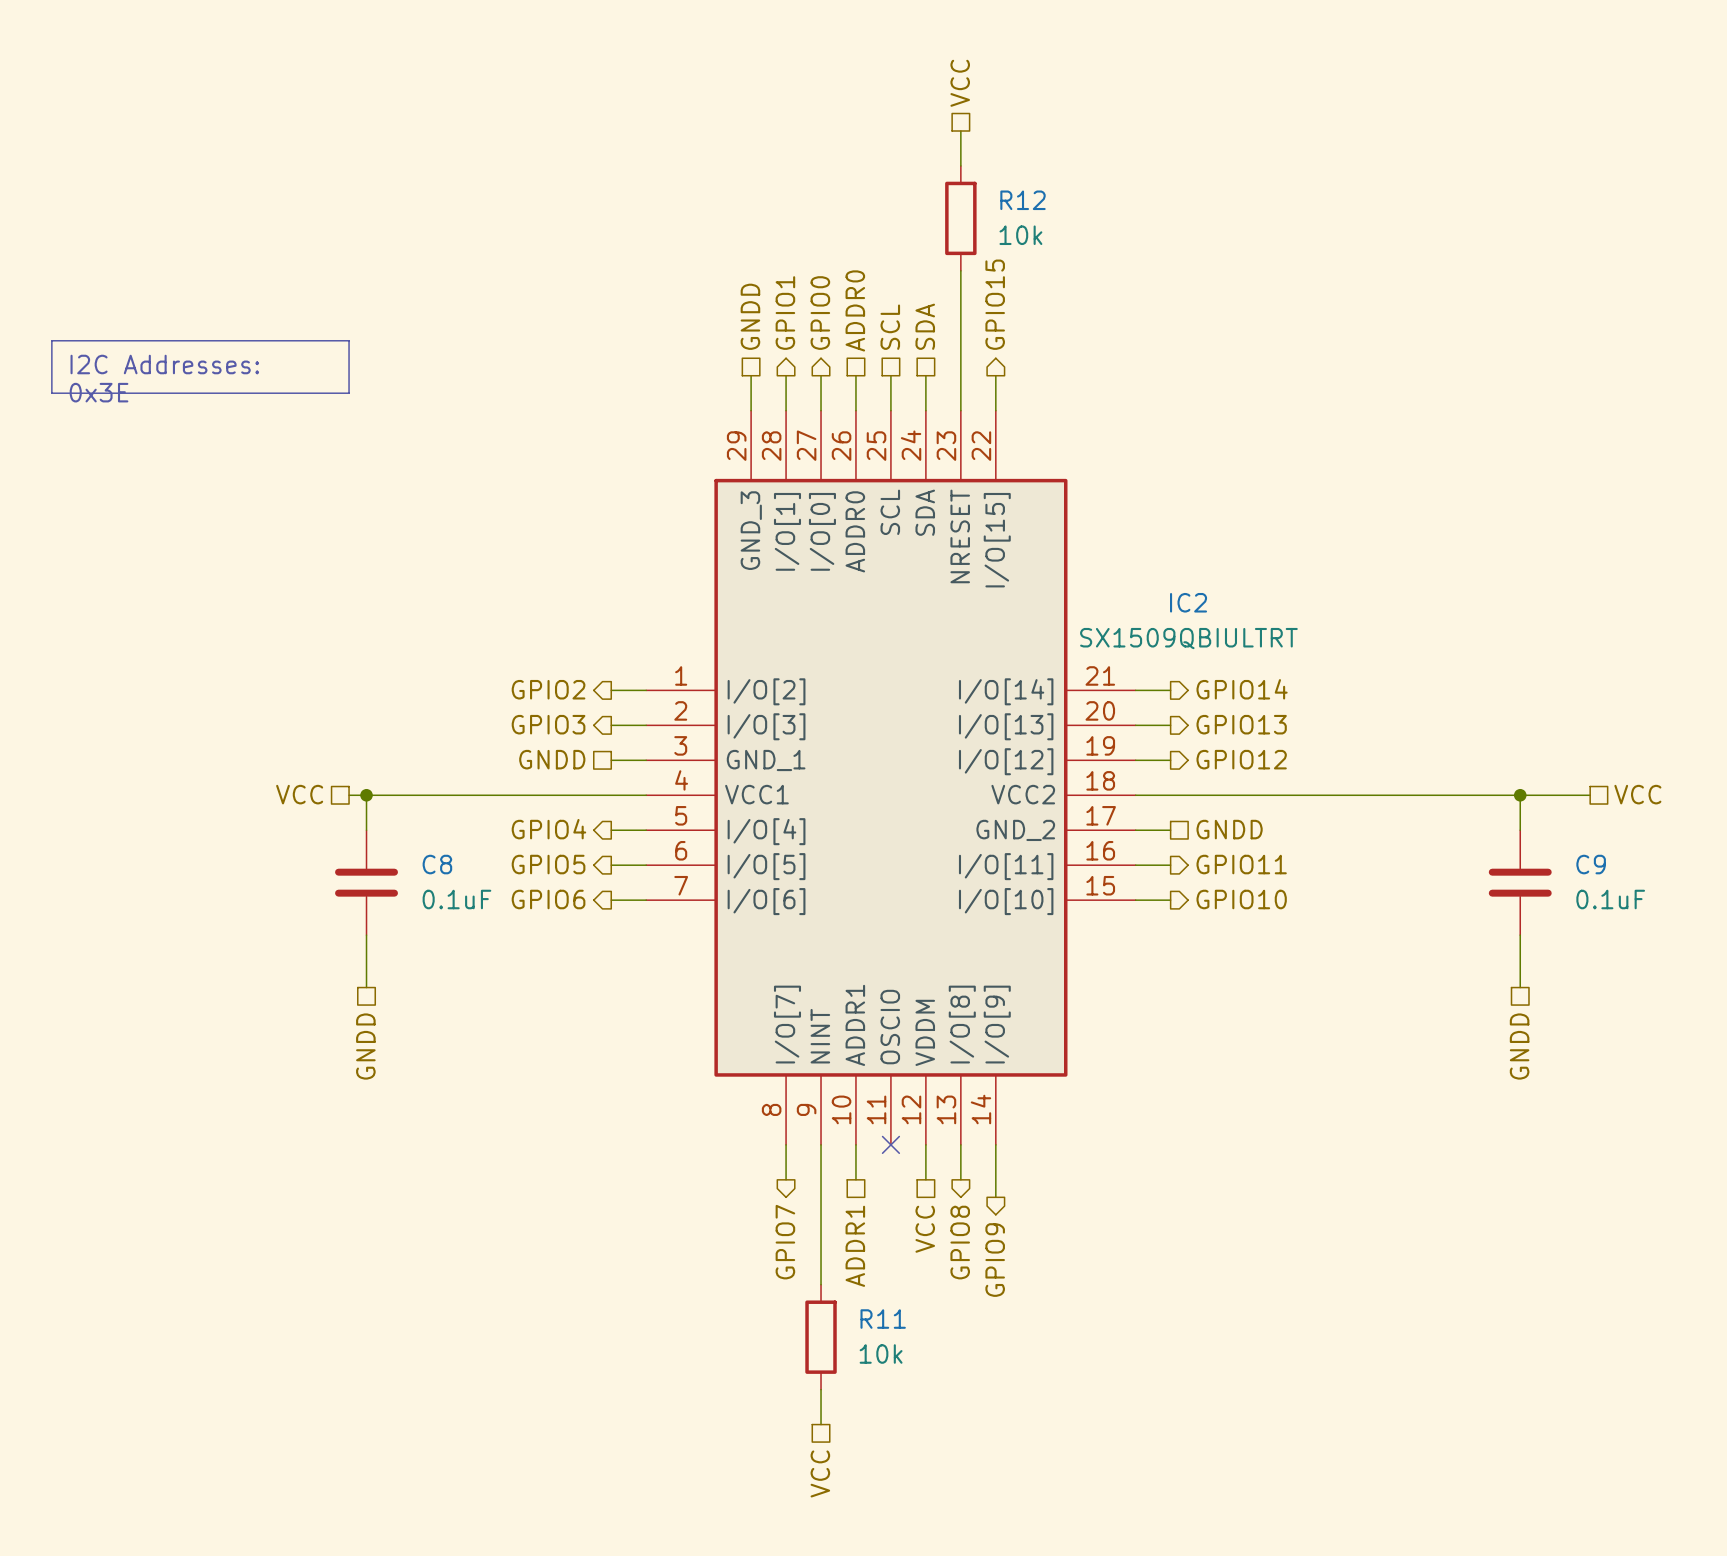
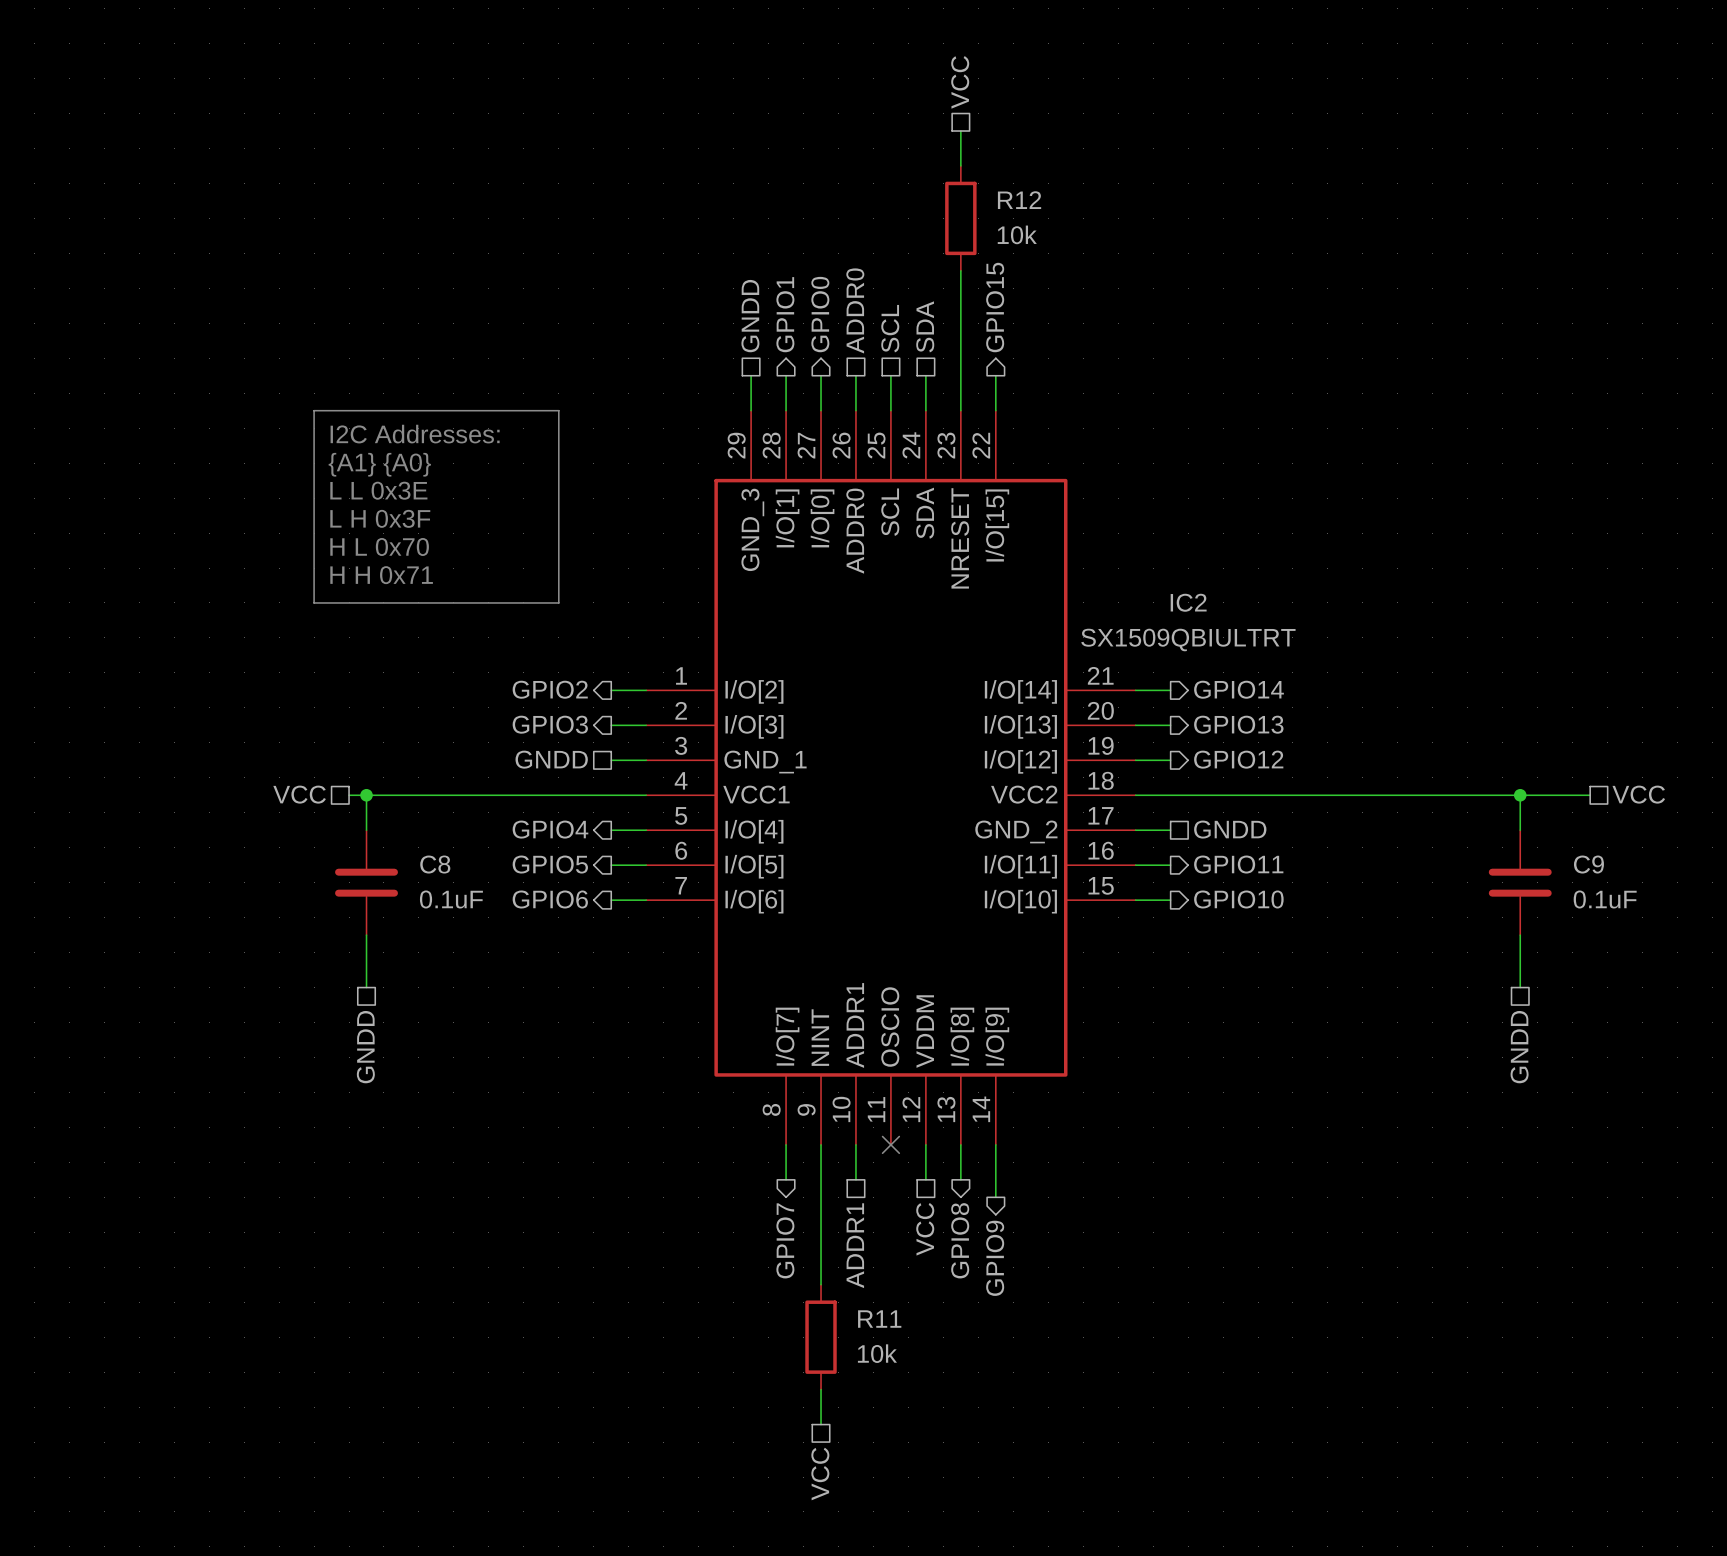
line: (51, 340) (349, 340) (349, 393) (51, 393) (51, 340) -> none
text position: I2C Addresses: (164, 364) -> I2C Addresses: (415, 434)
text: 0x3E (99, 392) -> none
line: none -> (314, 410) (558, 410) (558, 602) (314, 602) (314, 410)
text: none -> {A1} {A0} (379, 464)
text: none -> L L 0x3E (378, 490)
text: none -> L H 0x3F (380, 518)
text: none -> H L 0x70 (379, 546)
text: none -> H H 0x71 (381, 575)

